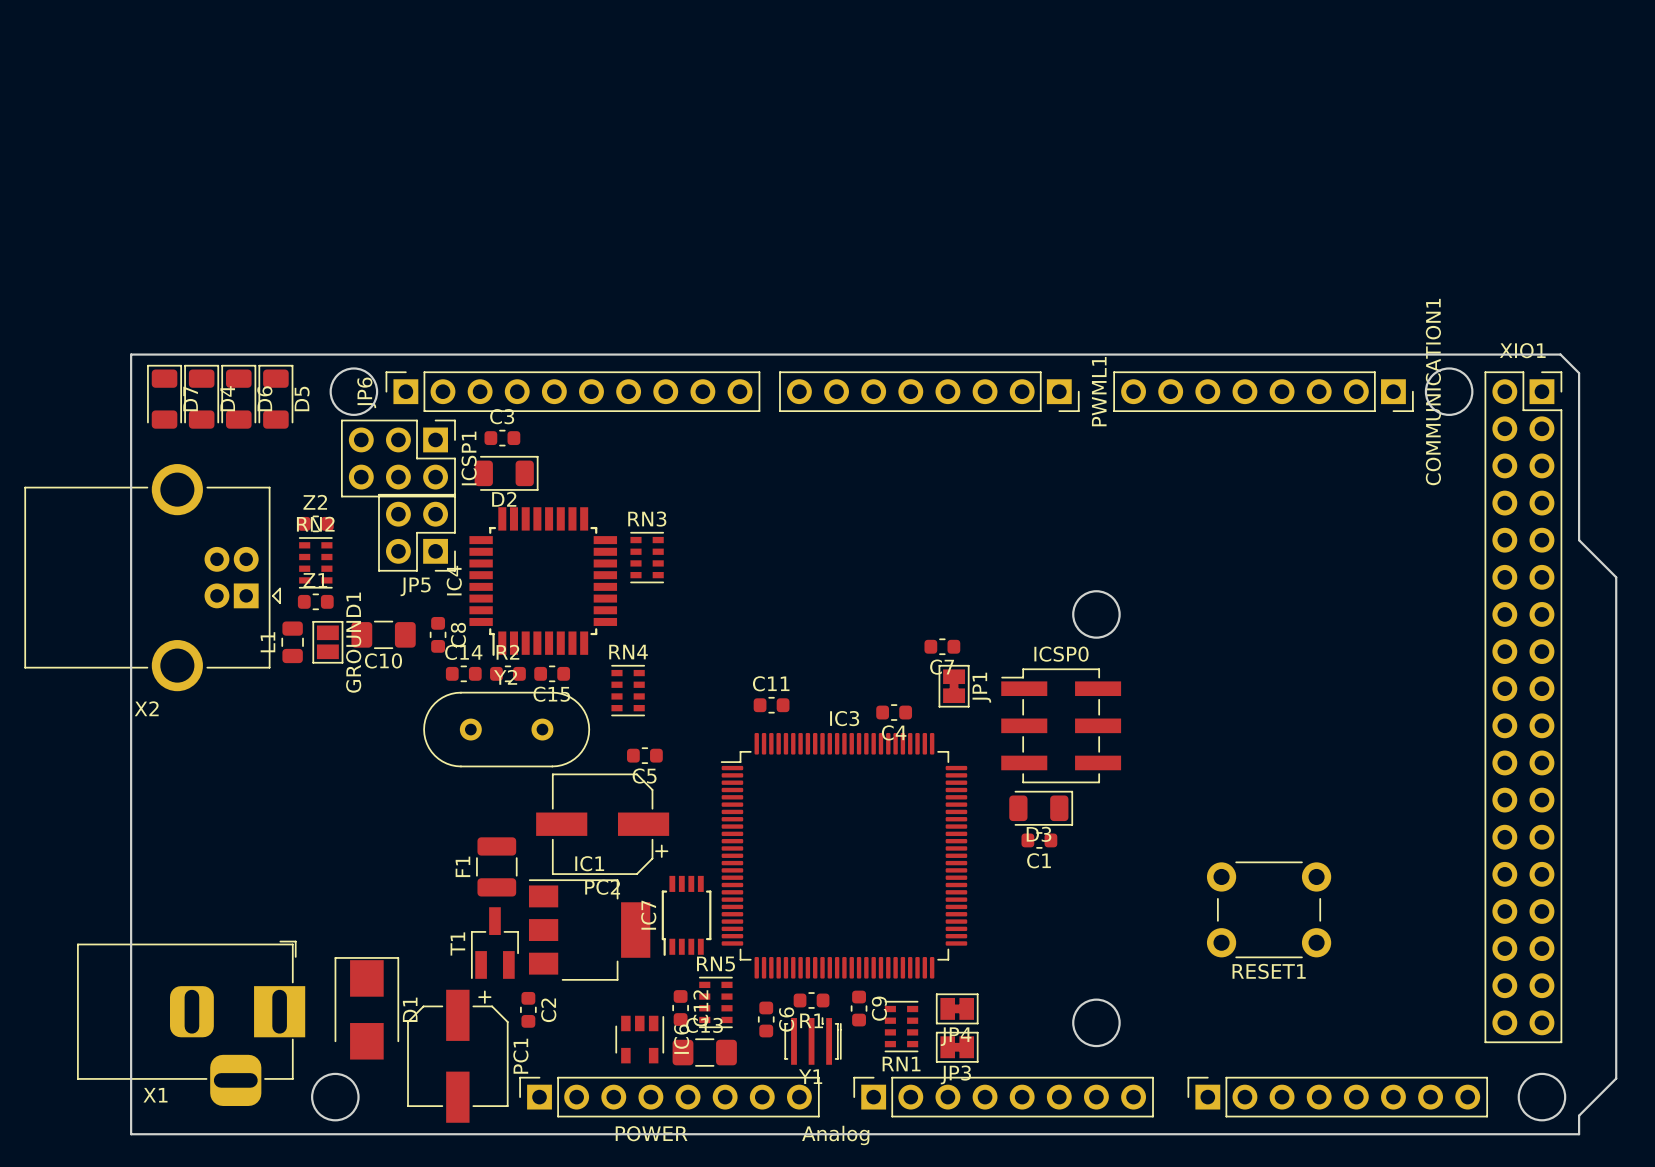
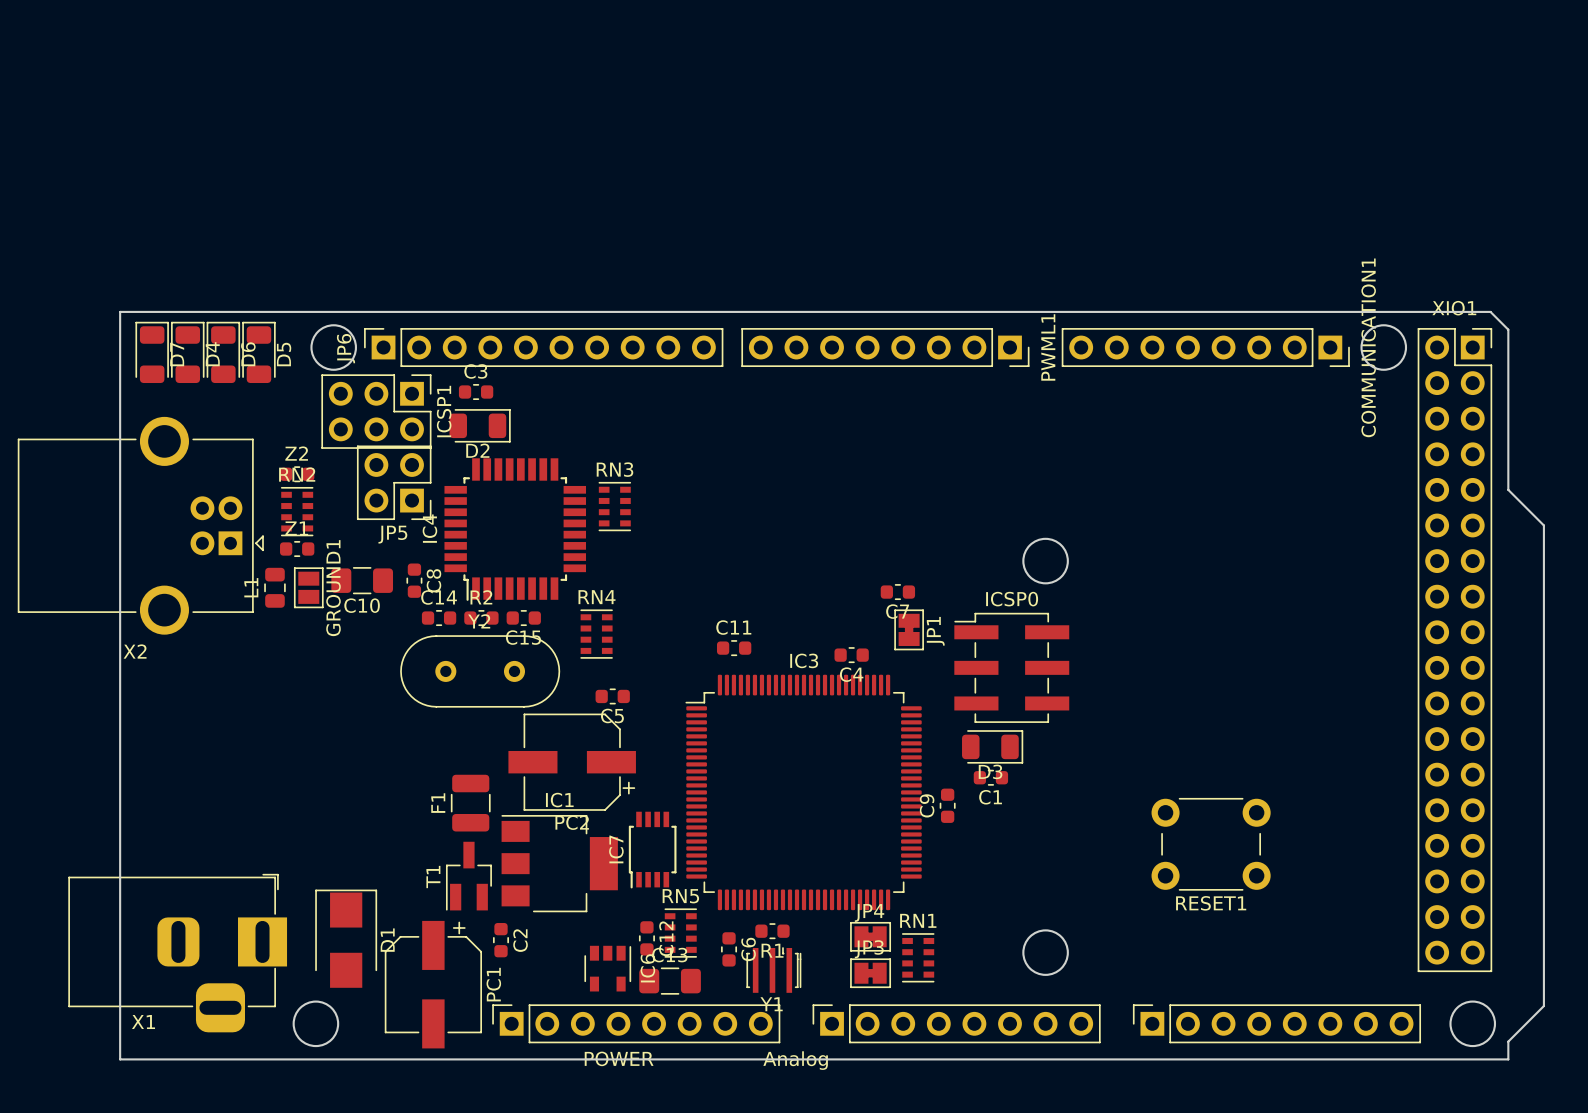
C9 position: (859, 1008) -> (947, 805)
C9 name position: C9 (879, 1008) -> C9 (927, 805)
JP4 position: (957, 1008) -> (870, 936)
RN1 position: (901, 1026) -> (918, 957)
JP4 name position: JP4 (956, 1036) -> JP4 (869, 912)
JP3 position: (957, 1047) -> (870, 973)
RN1 name position: RN1 (901, 1064) -> RN1 (918, 920)
JP3 name position: JP3 (955, 1074) -> JP3 (869, 949)

